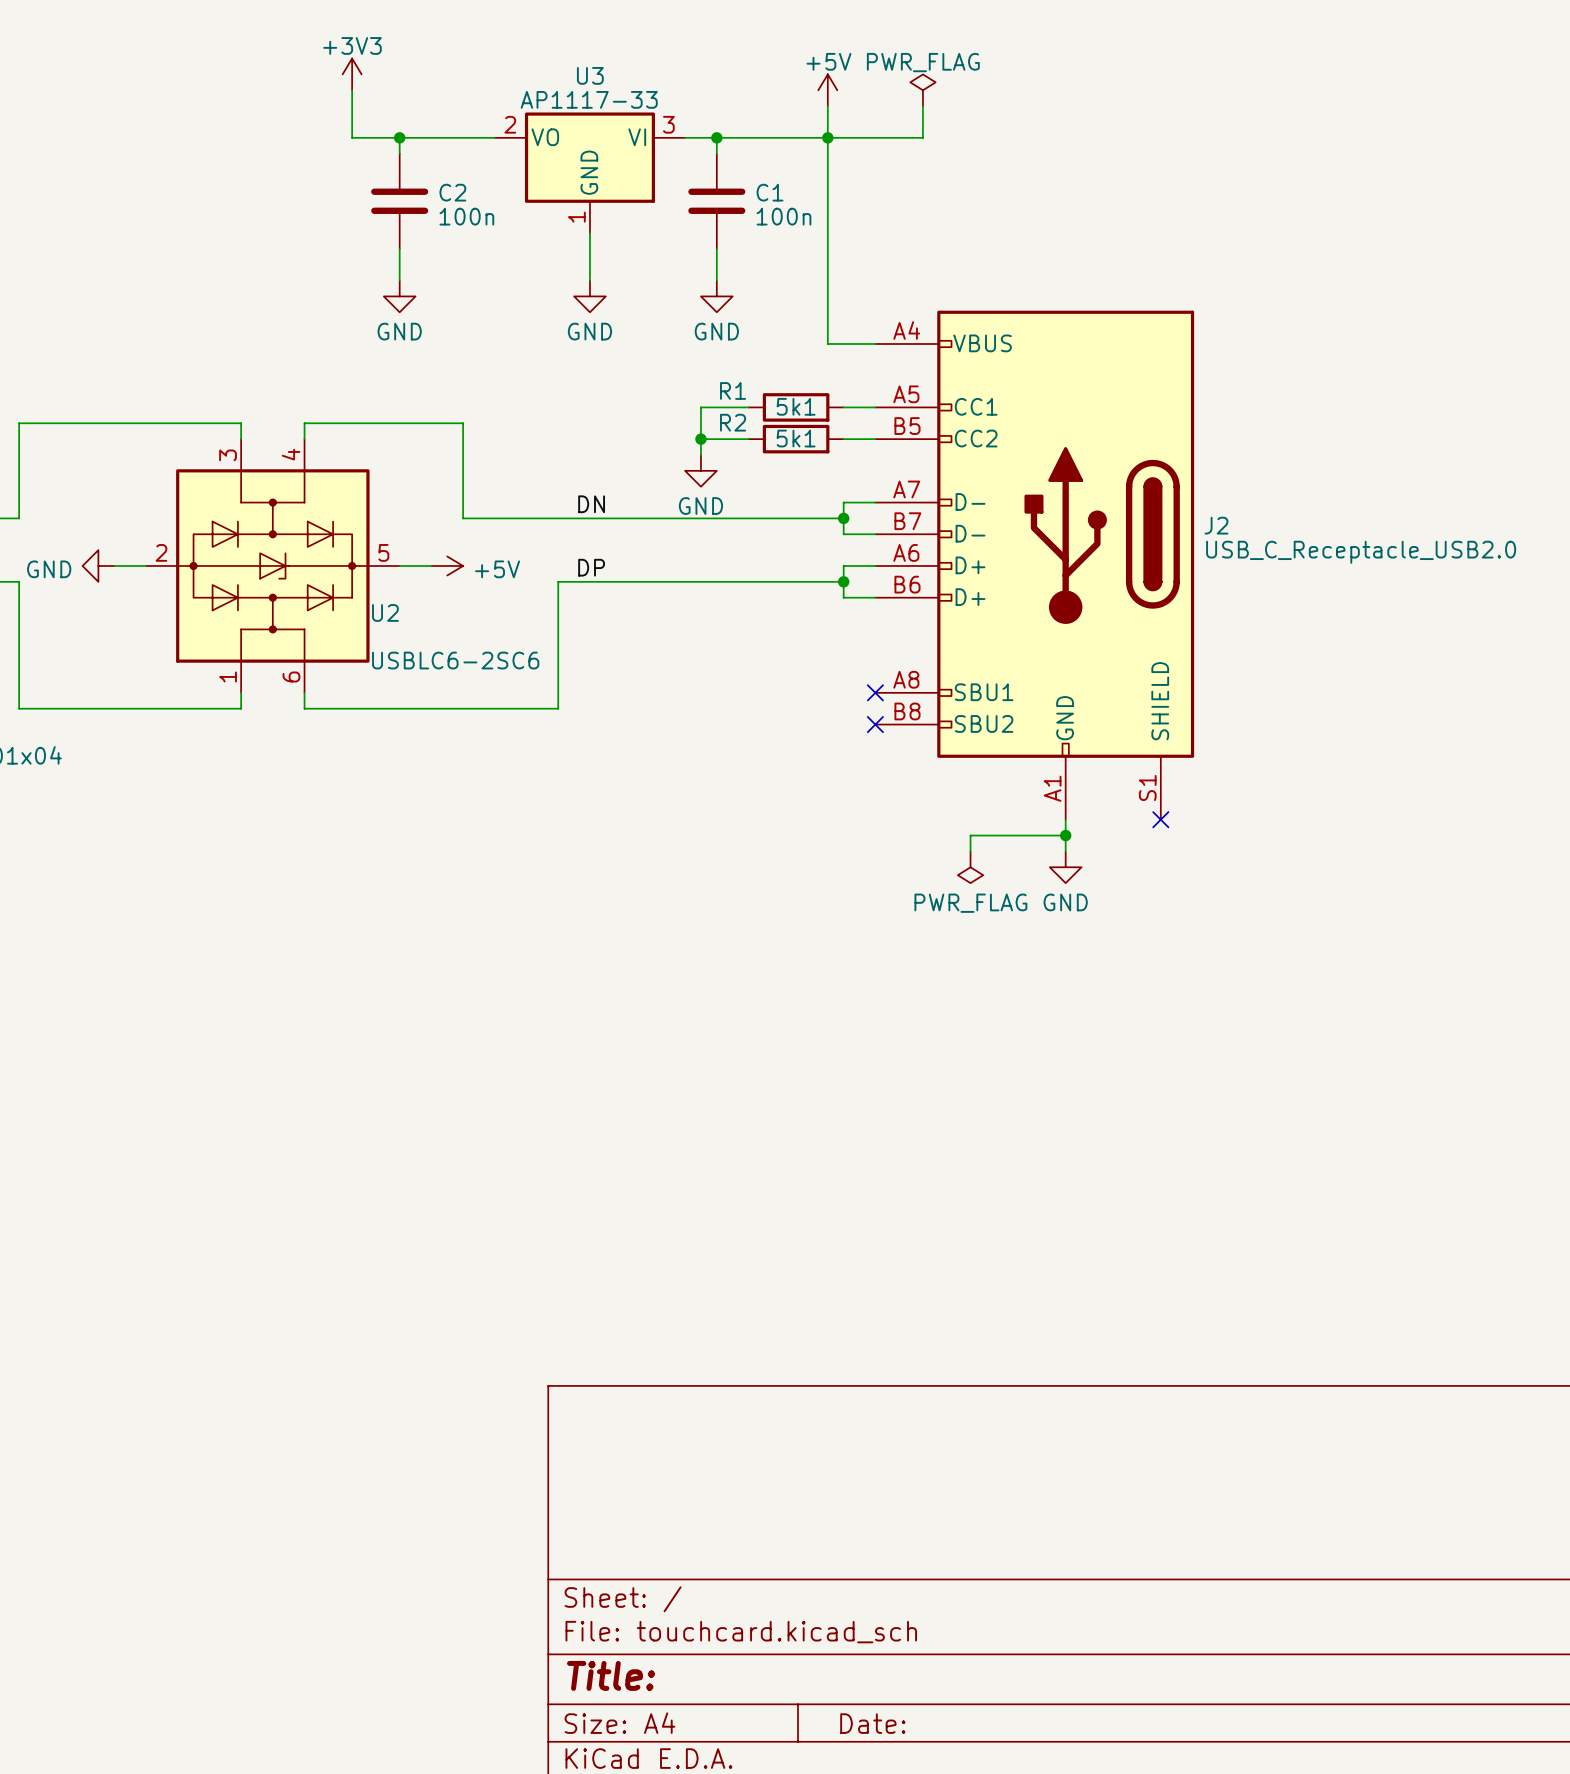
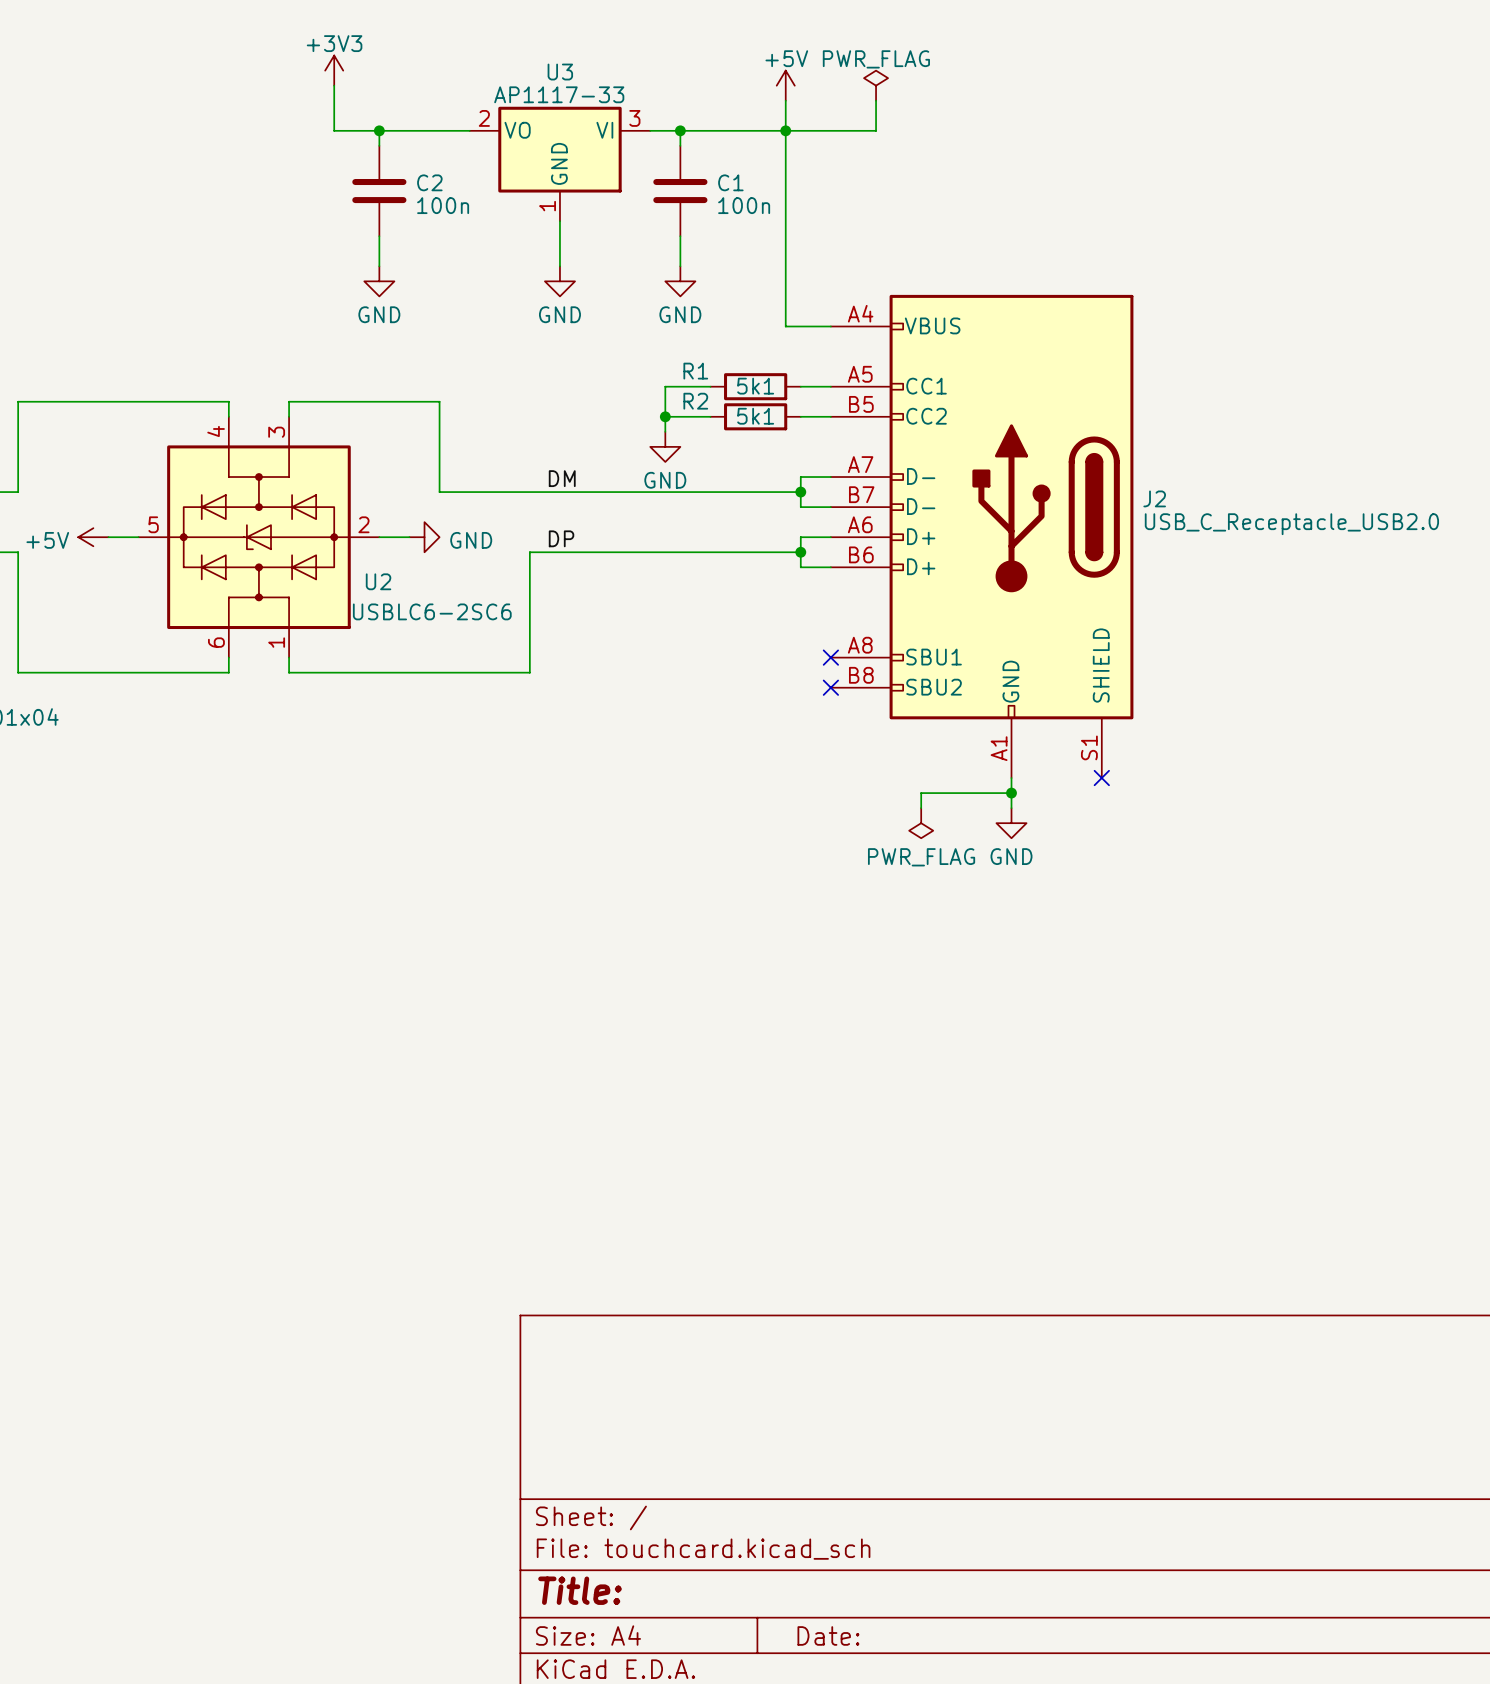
label: DN (591, 504) -> DM (562, 478)
power symbol: GND (98, 565) -> +5V (93, 537)
U2 flip: as is (272, 565) -> left-right (258, 537)
power symbol: +5V (447, 565) -> GND (424, 537)

